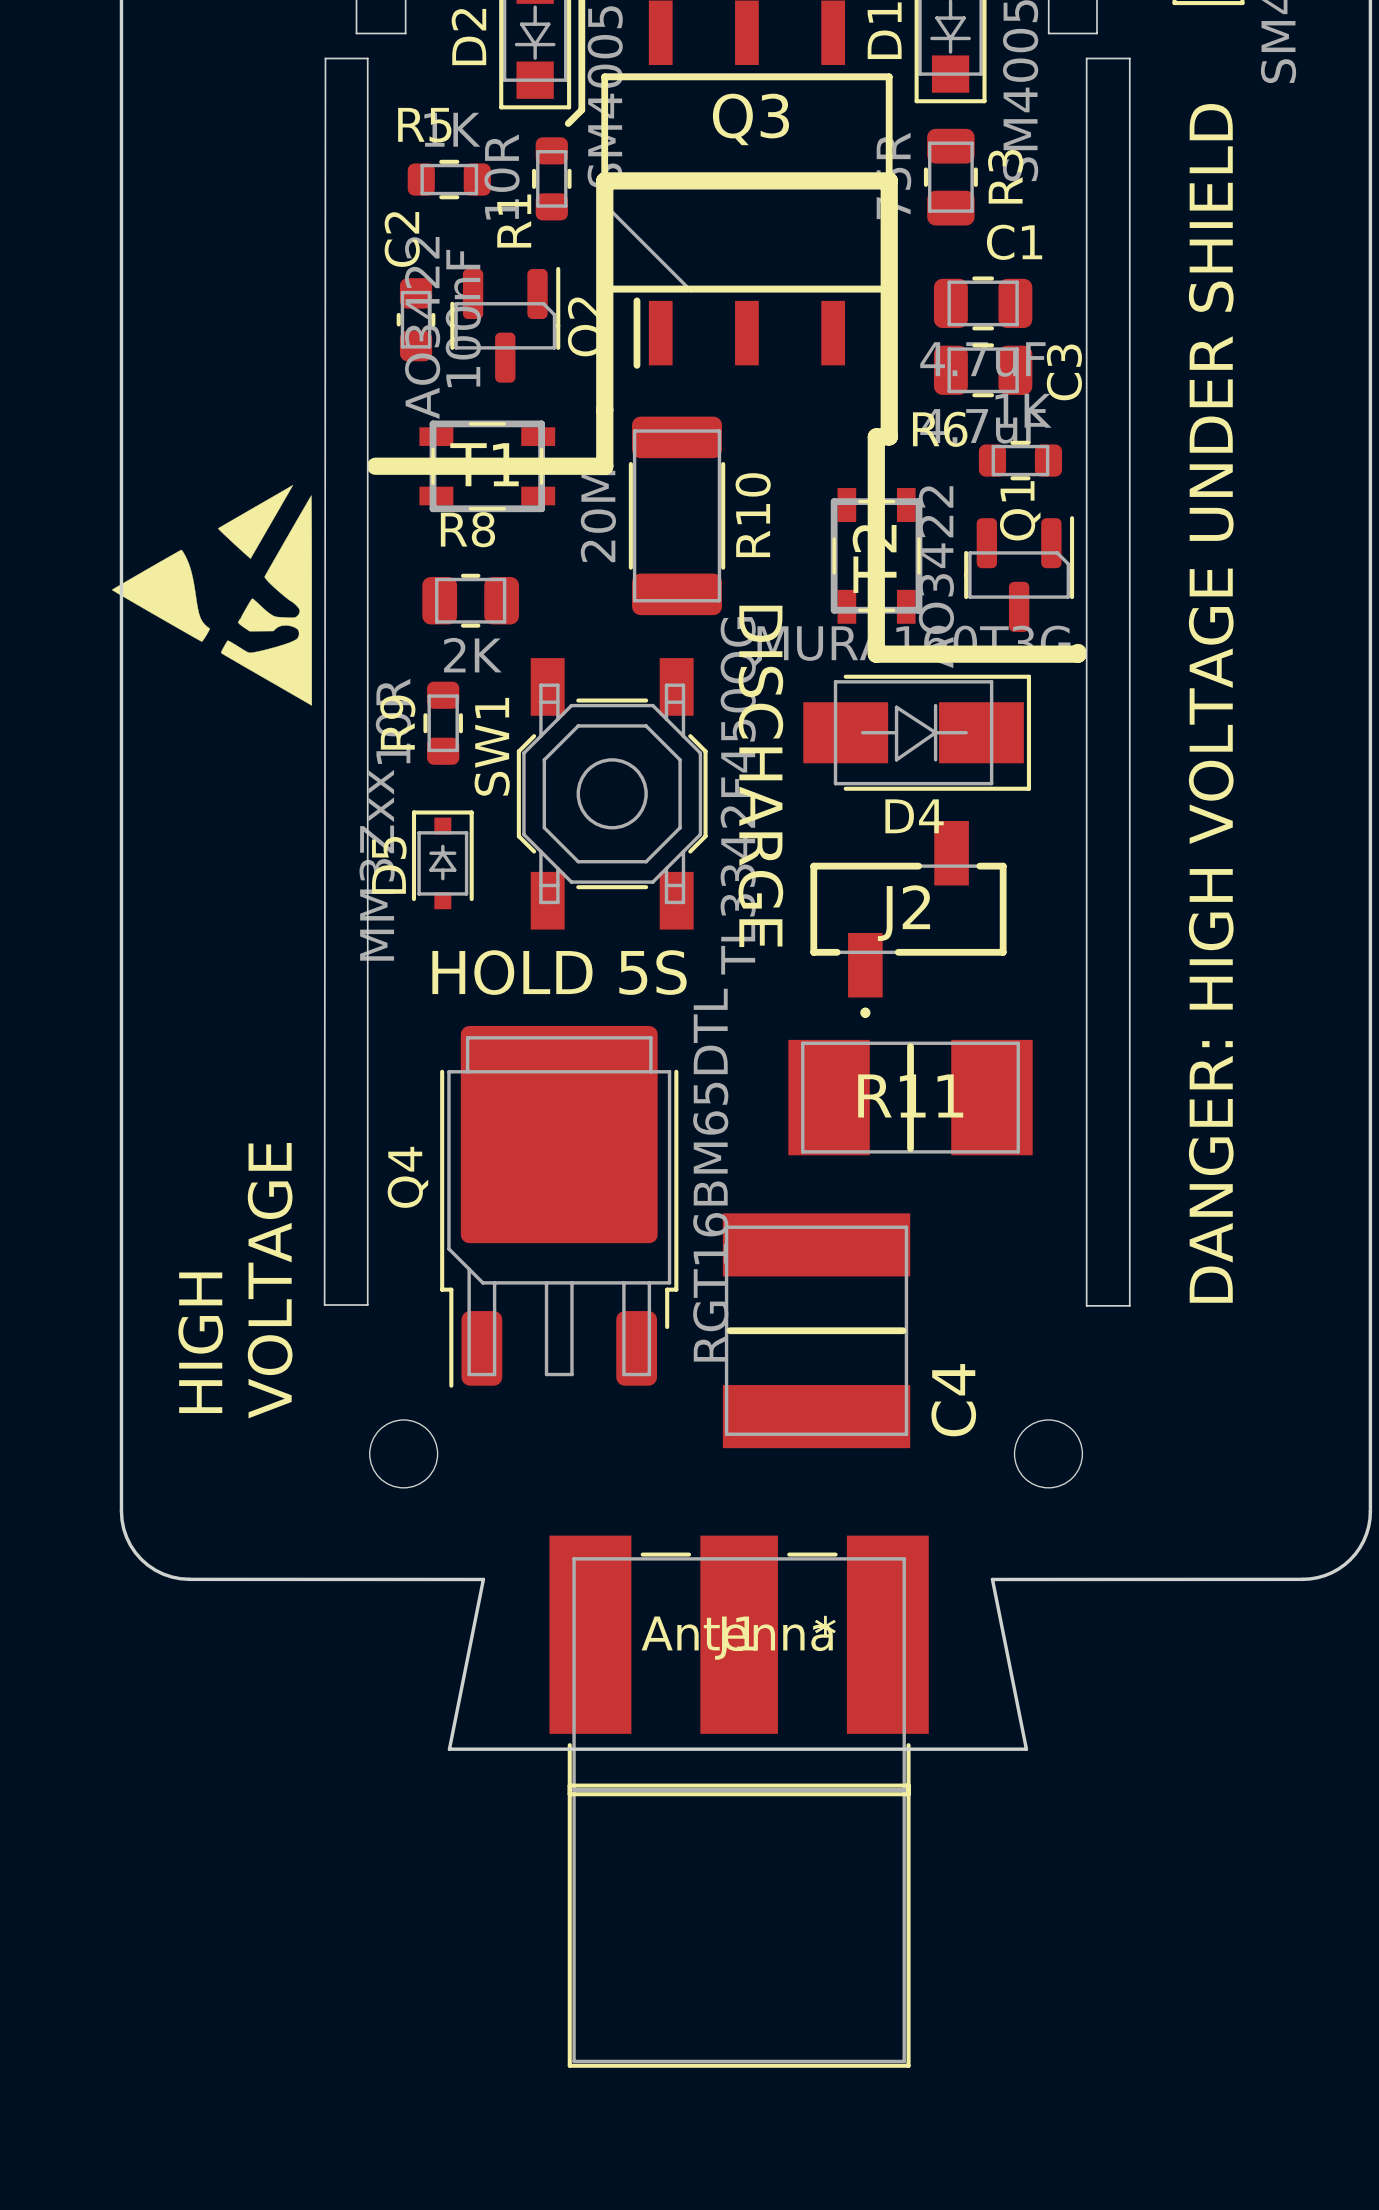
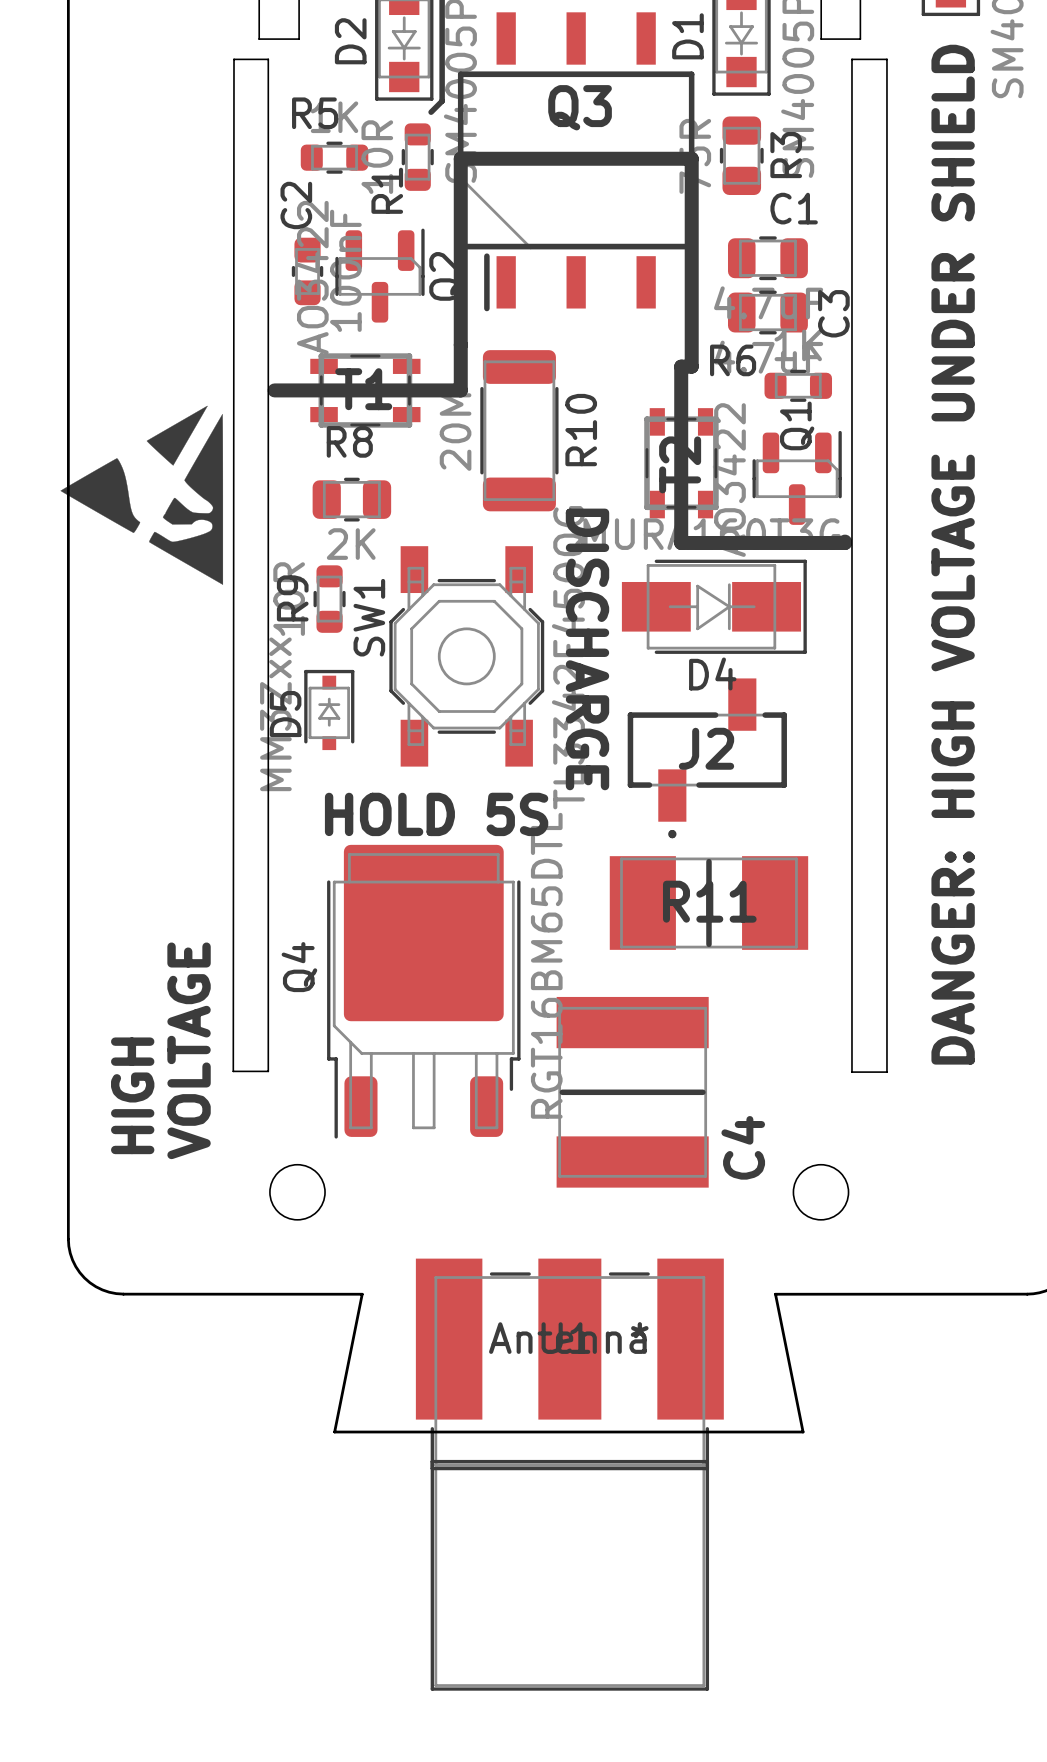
text position: HOLD 5S (559, 972) -> HOLD 5S (436, 814)

